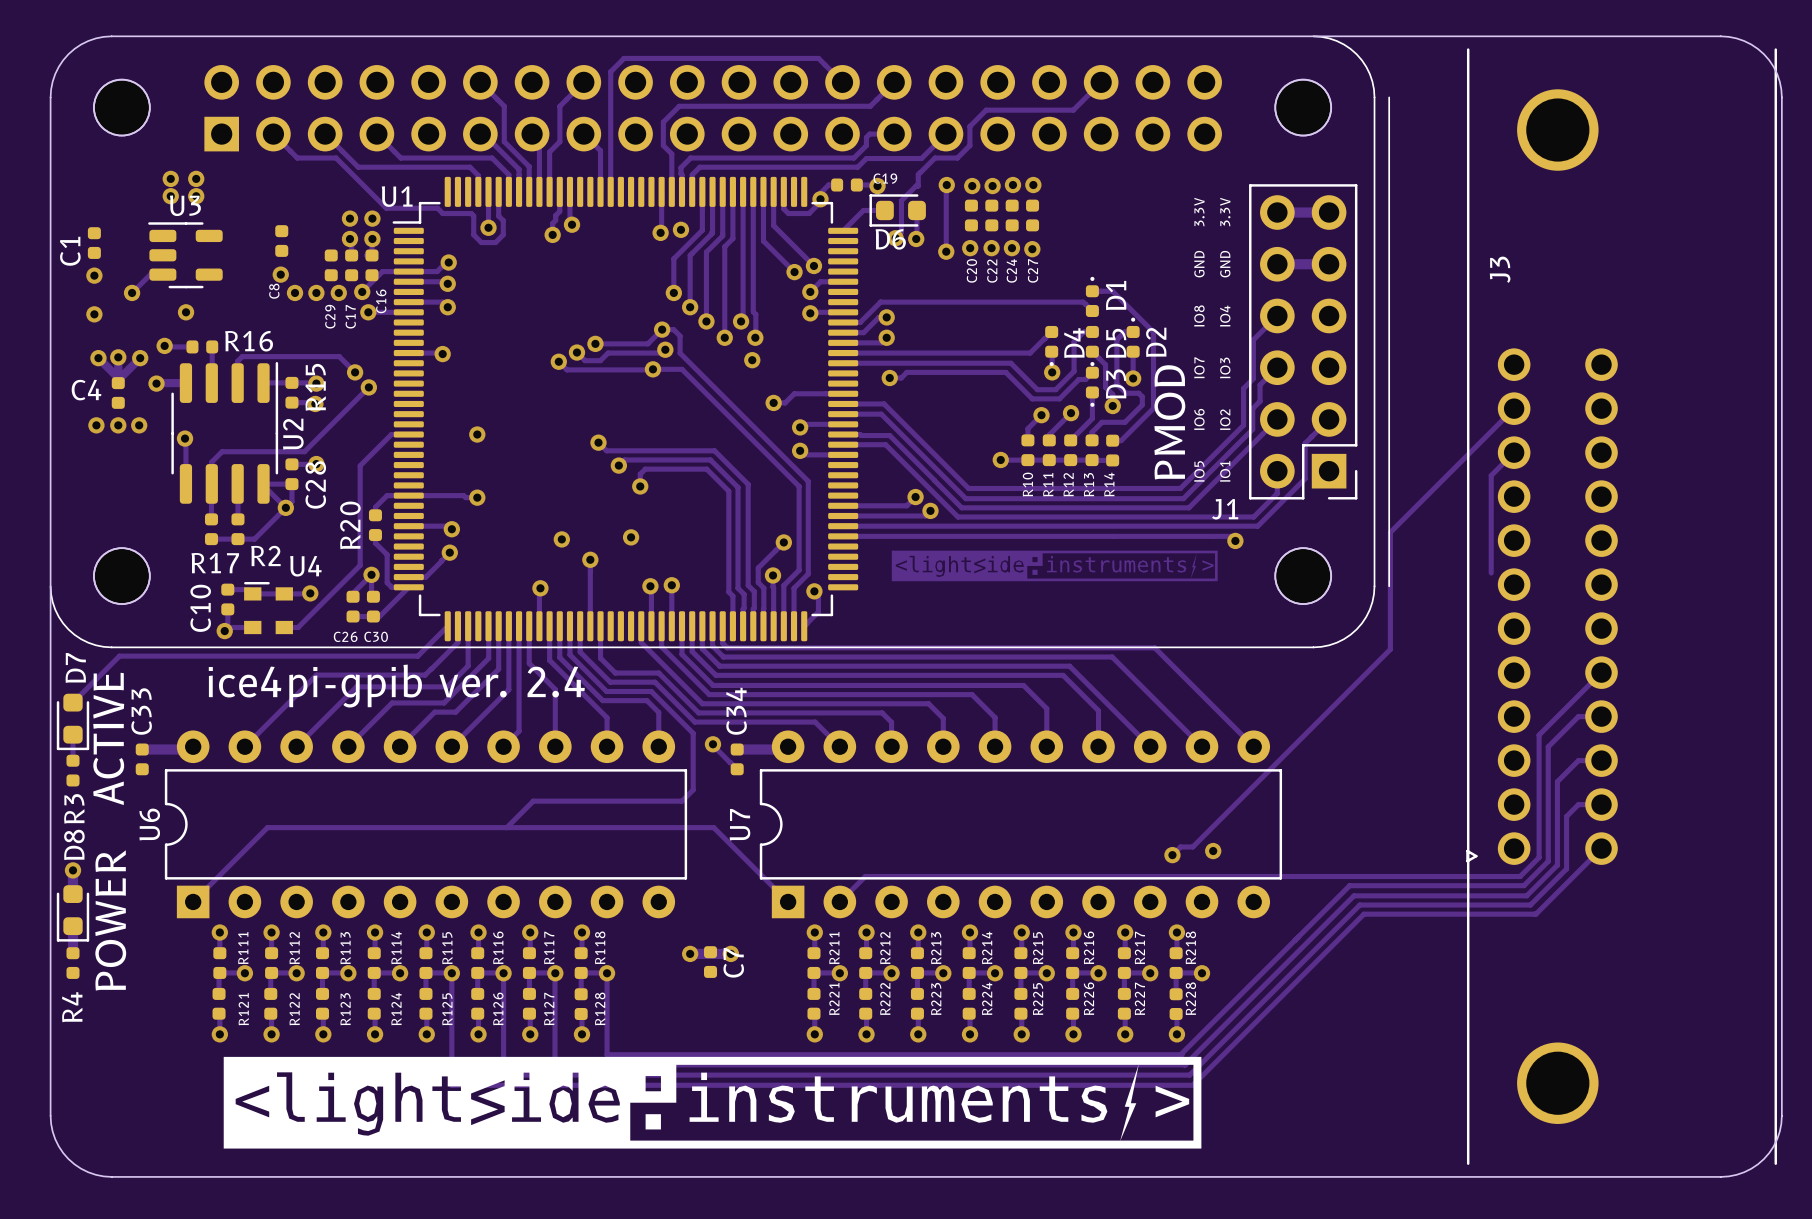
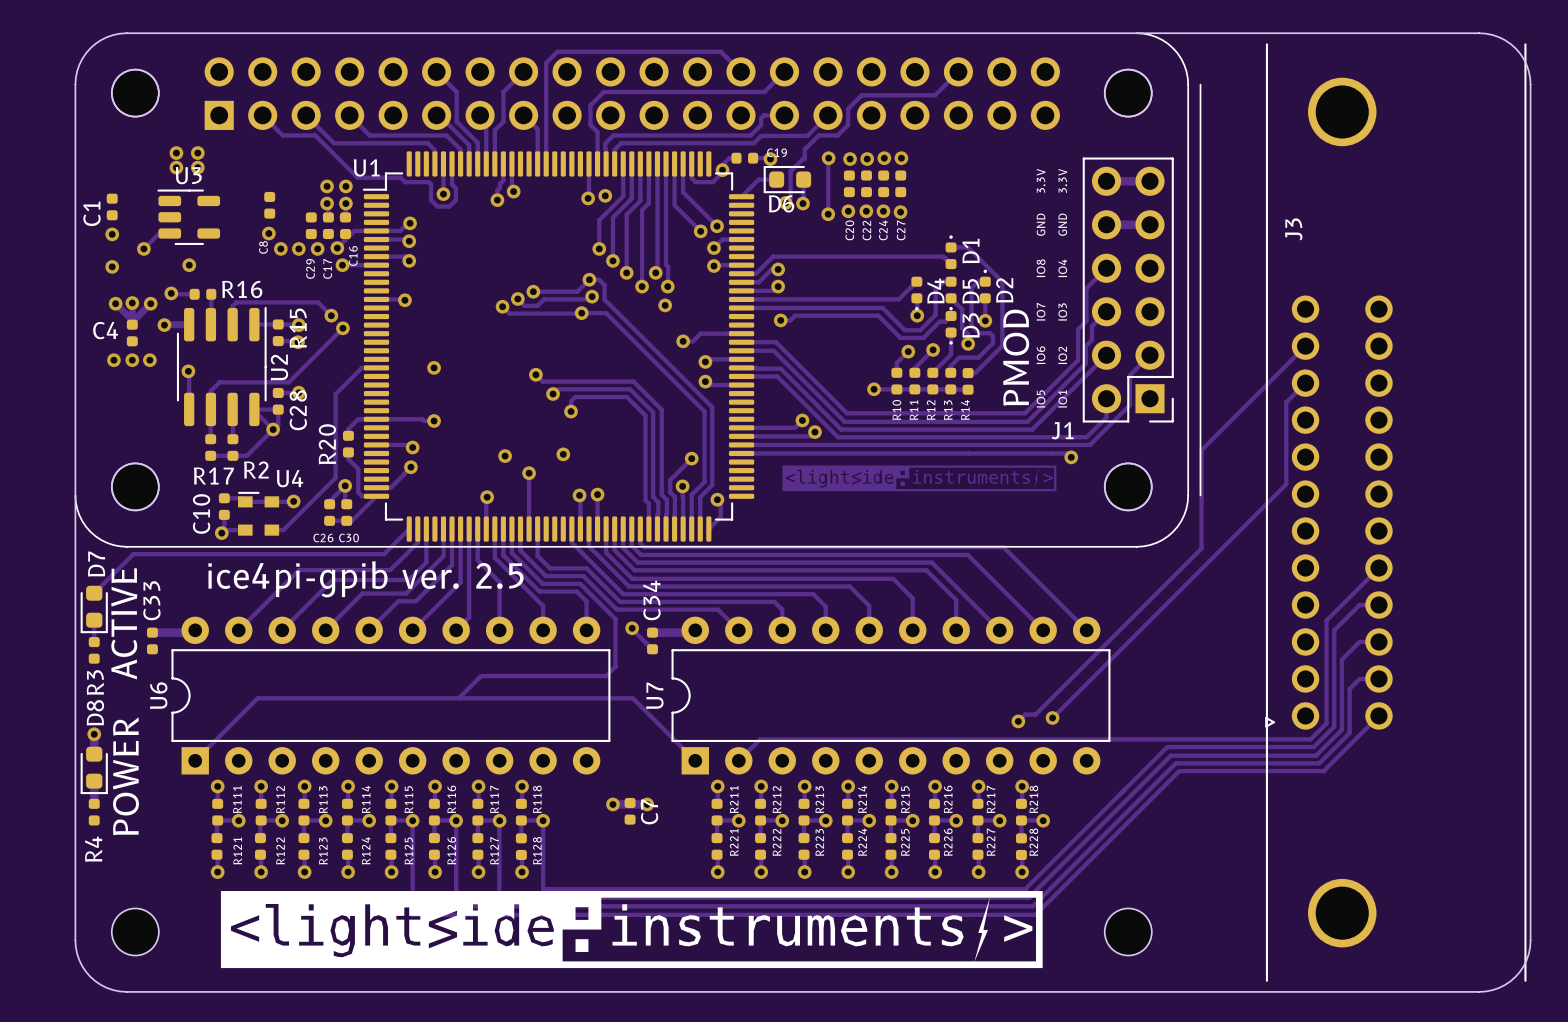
track: none -> (1286, 484) (1052, 718)
text: ice4pi-gpib ver. 2.4 (396, 686) -> ice4pi-gpib ver. 2.5 (365, 579)
part: none -> (135, 931)
part: none -> (1128, 931)

